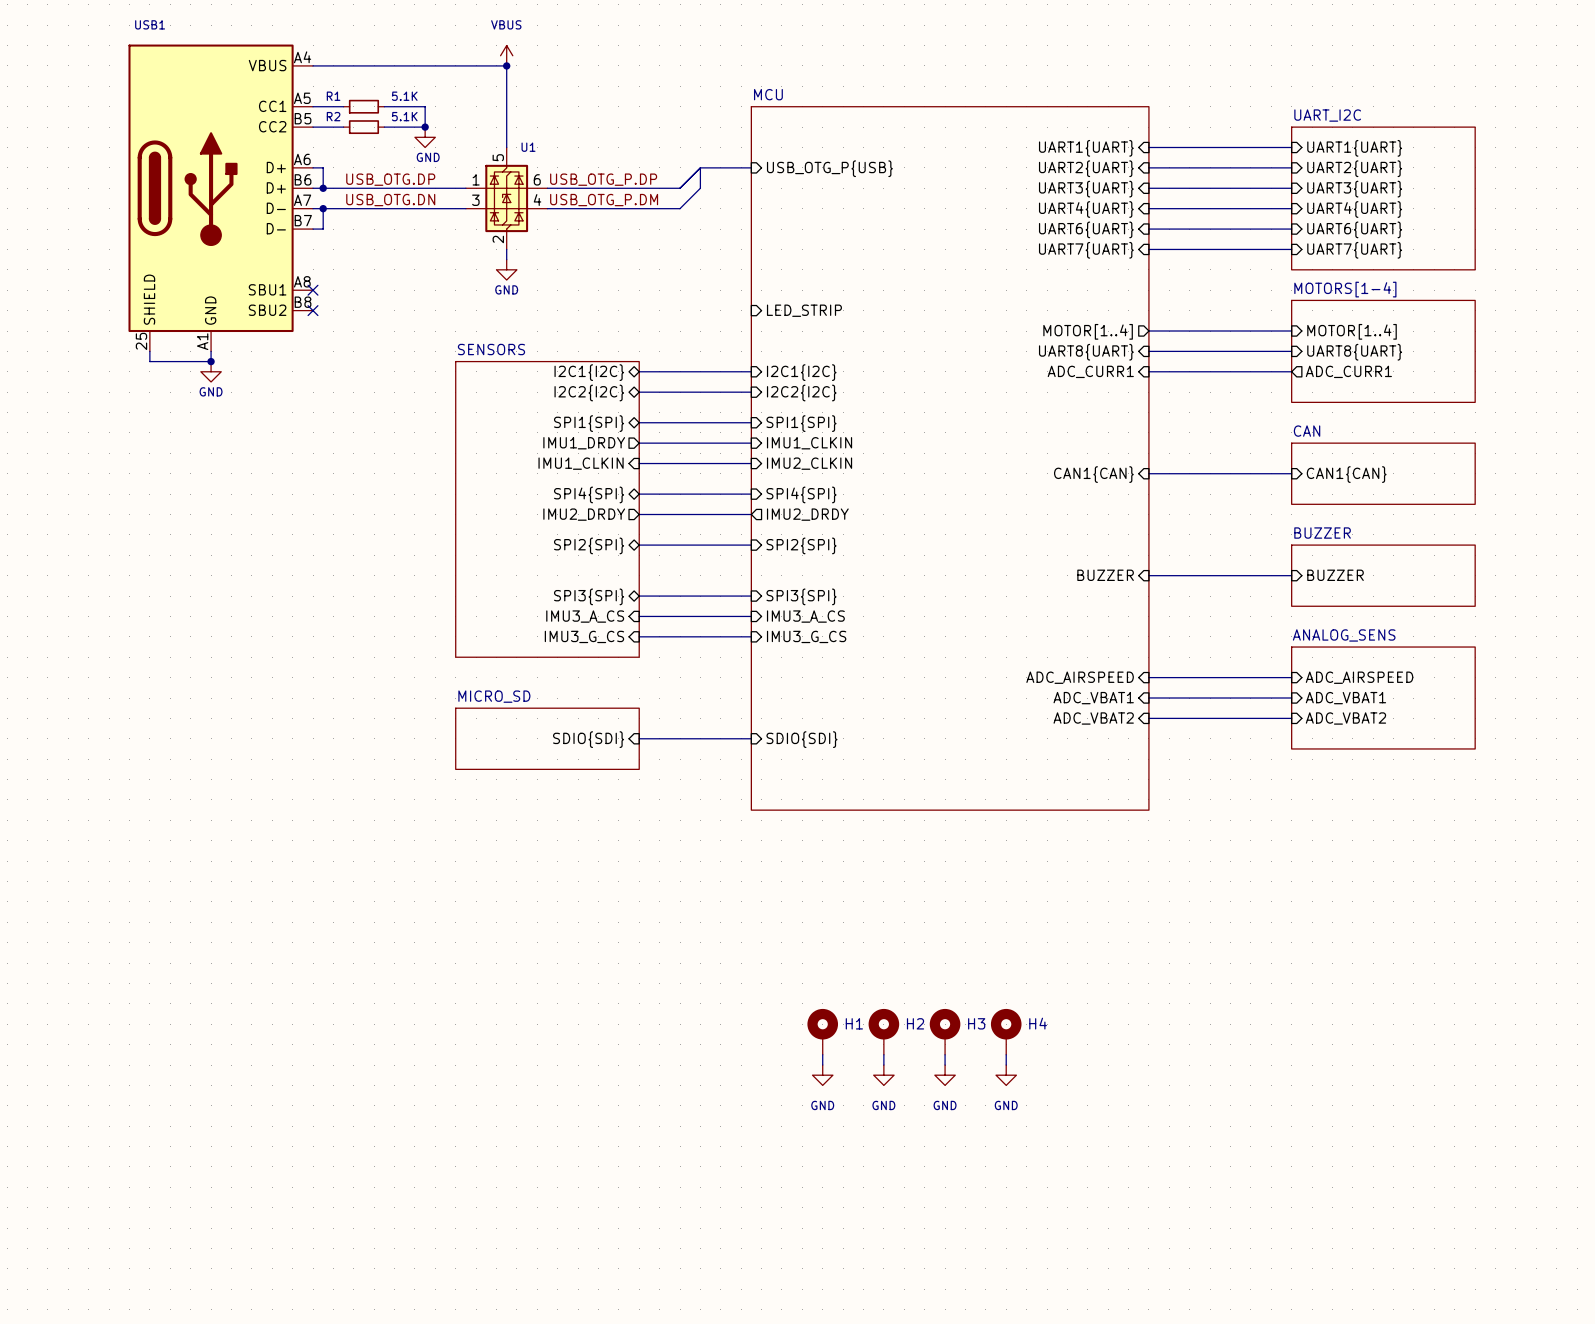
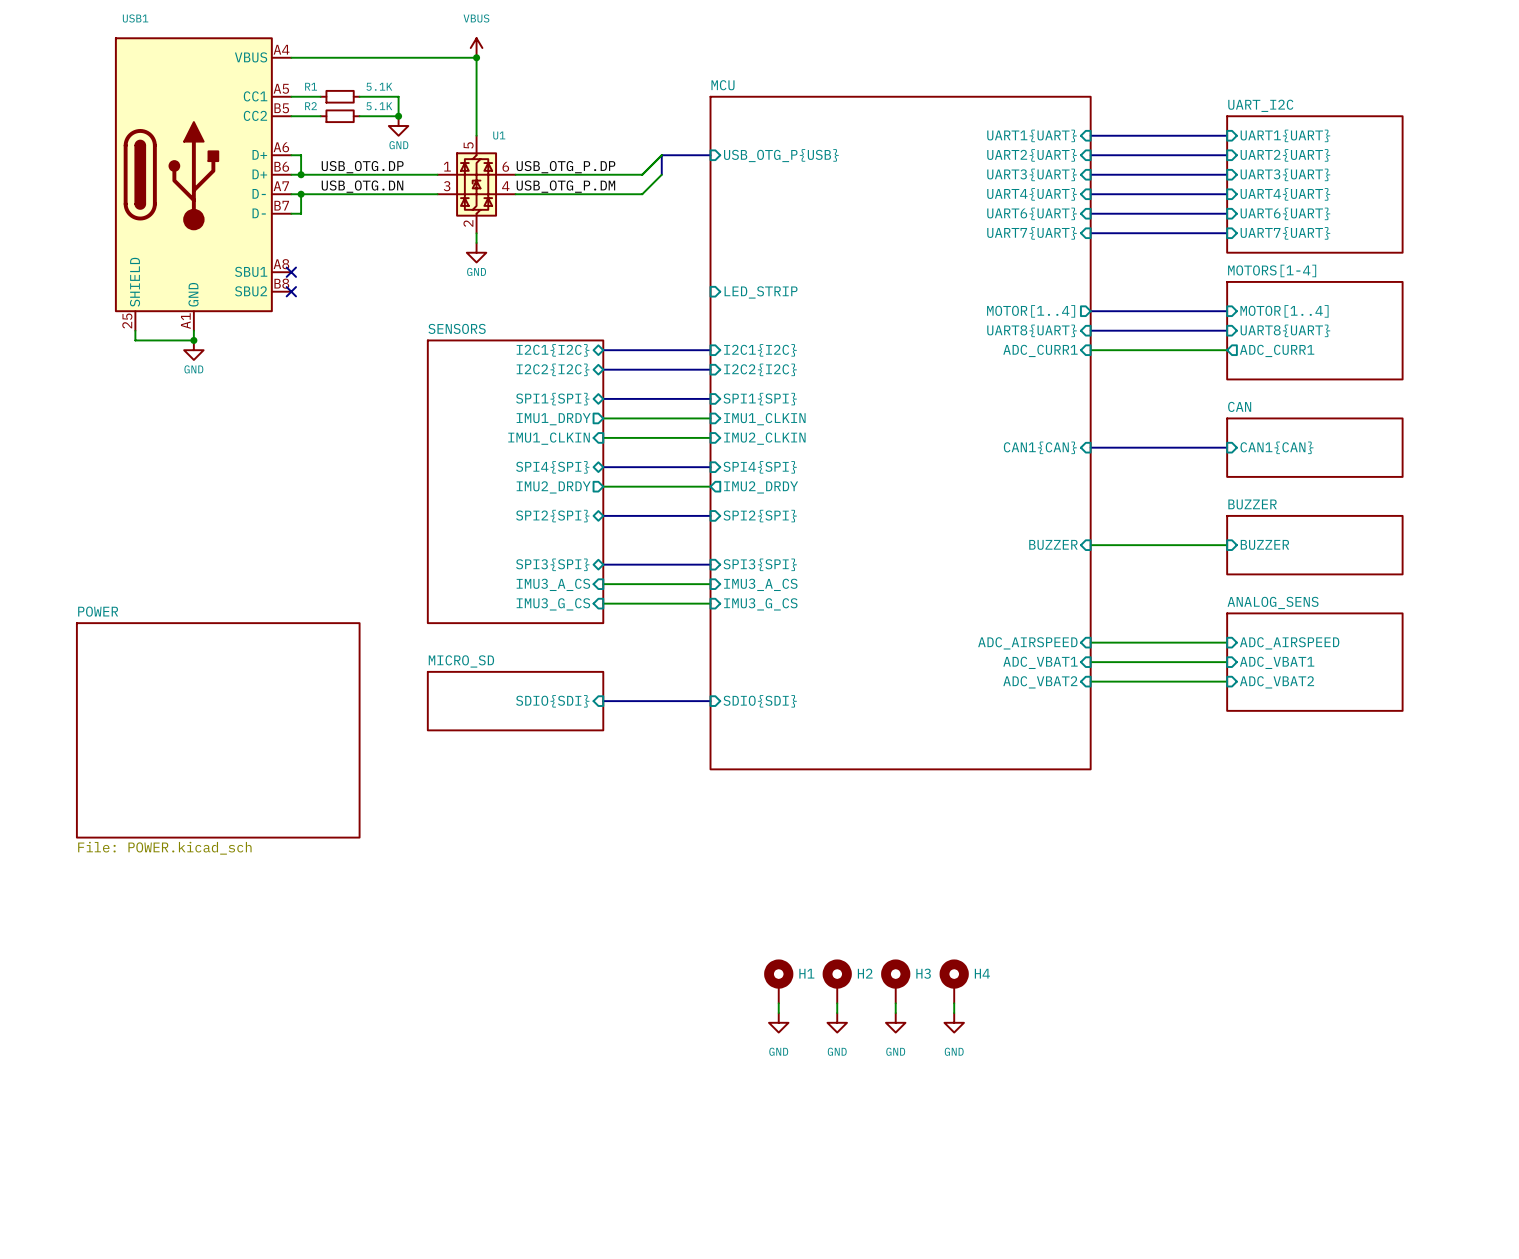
sheet POWER: none -> File: POWER.kicad_sch (218, 730)

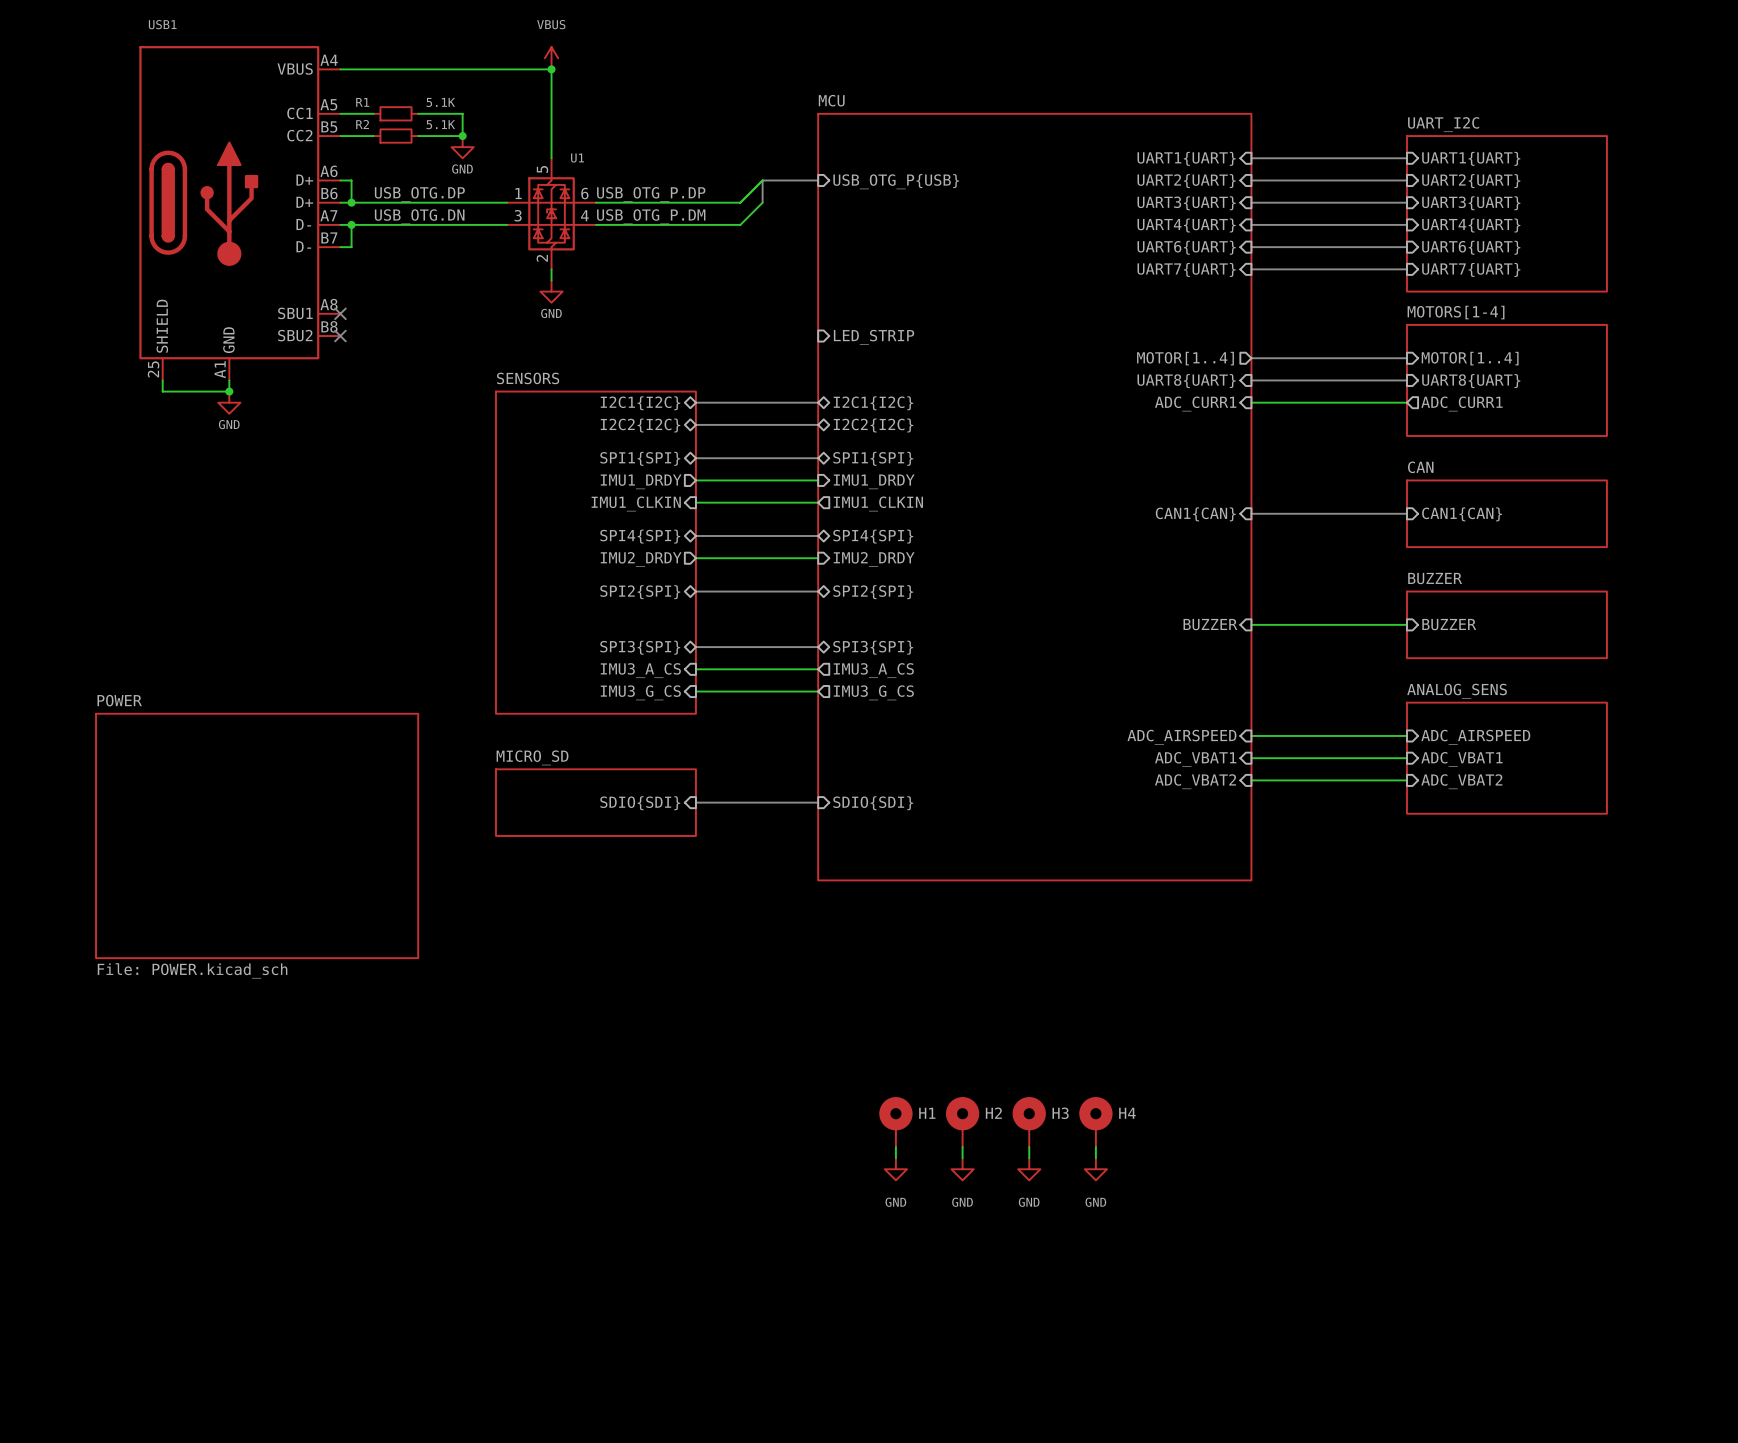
sheet pin shape: input (760, 350) -> bidirectional (873, 403)
sheet pin shape: input (760, 369) -> bidirectional (873, 425)
sheet pin shape: input (760, 399) -> bidirectional (873, 458)
sheet pin: IMU1_CLKIN (764, 419) -> IMU1_DRDY (874, 481)
sheet pin shape: input (764, 438) -> output (878, 503)
sheet pin: IMU2_CLKIN (764, 438) -> IMU1_CLKIN (878, 503)
sheet pin shape: input (760, 467) -> bidirectional (873, 536)
sheet pin shape: output (761, 487) -> input (874, 559)
sheet pin shape: input (760, 516) -> bidirectional (873, 592)
sheet pin shape: input (760, 564) -> bidirectional (873, 647)
sheet pin shape: input (760, 584) -> output (873, 670)
sheet pin shape: input (760, 604) -> output (873, 692)

